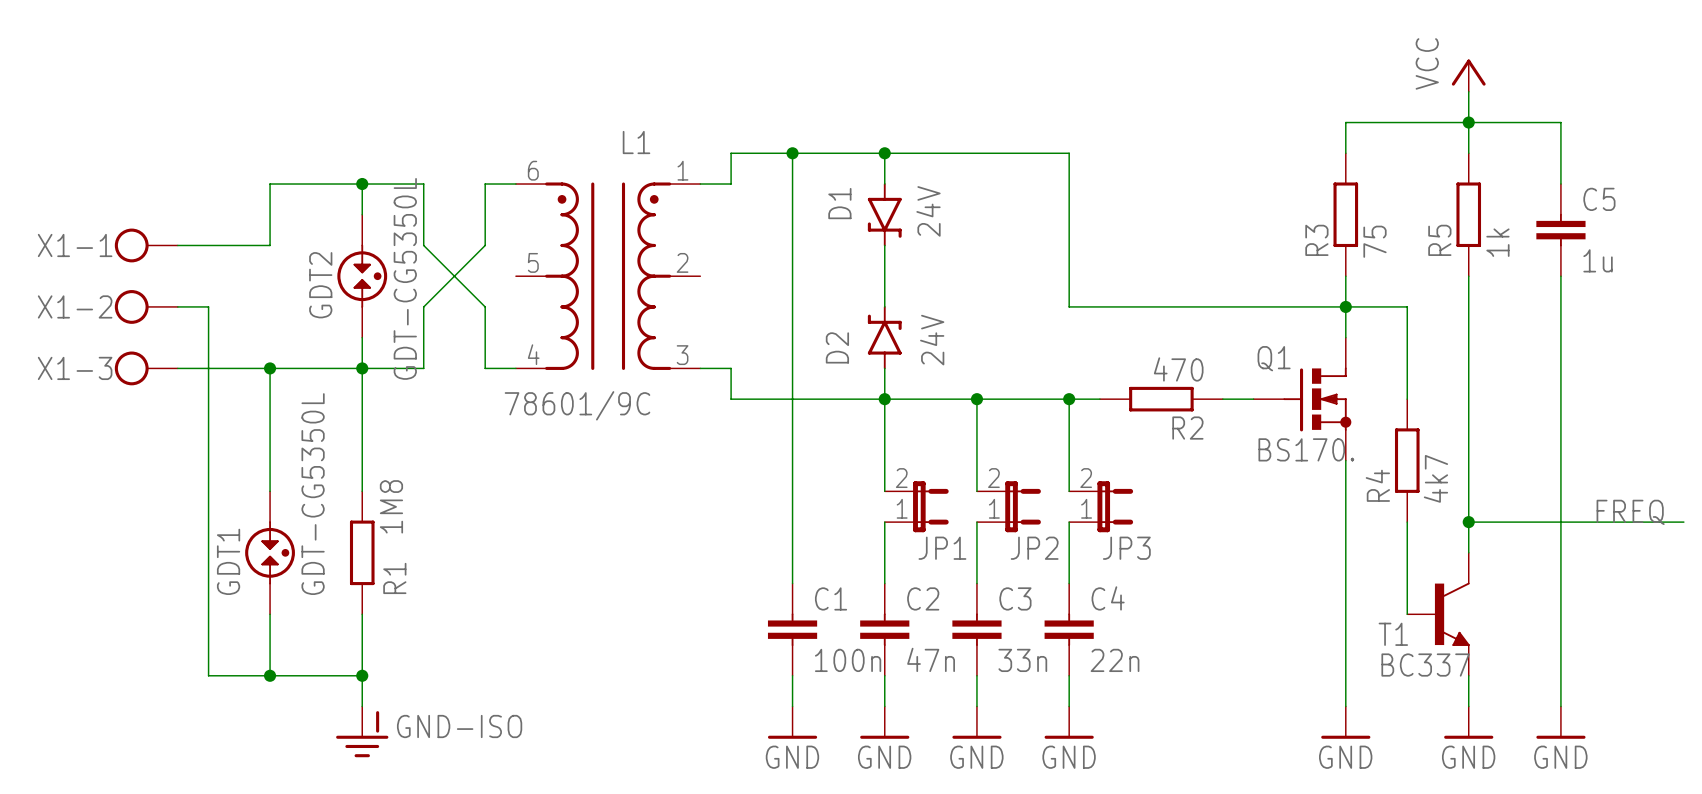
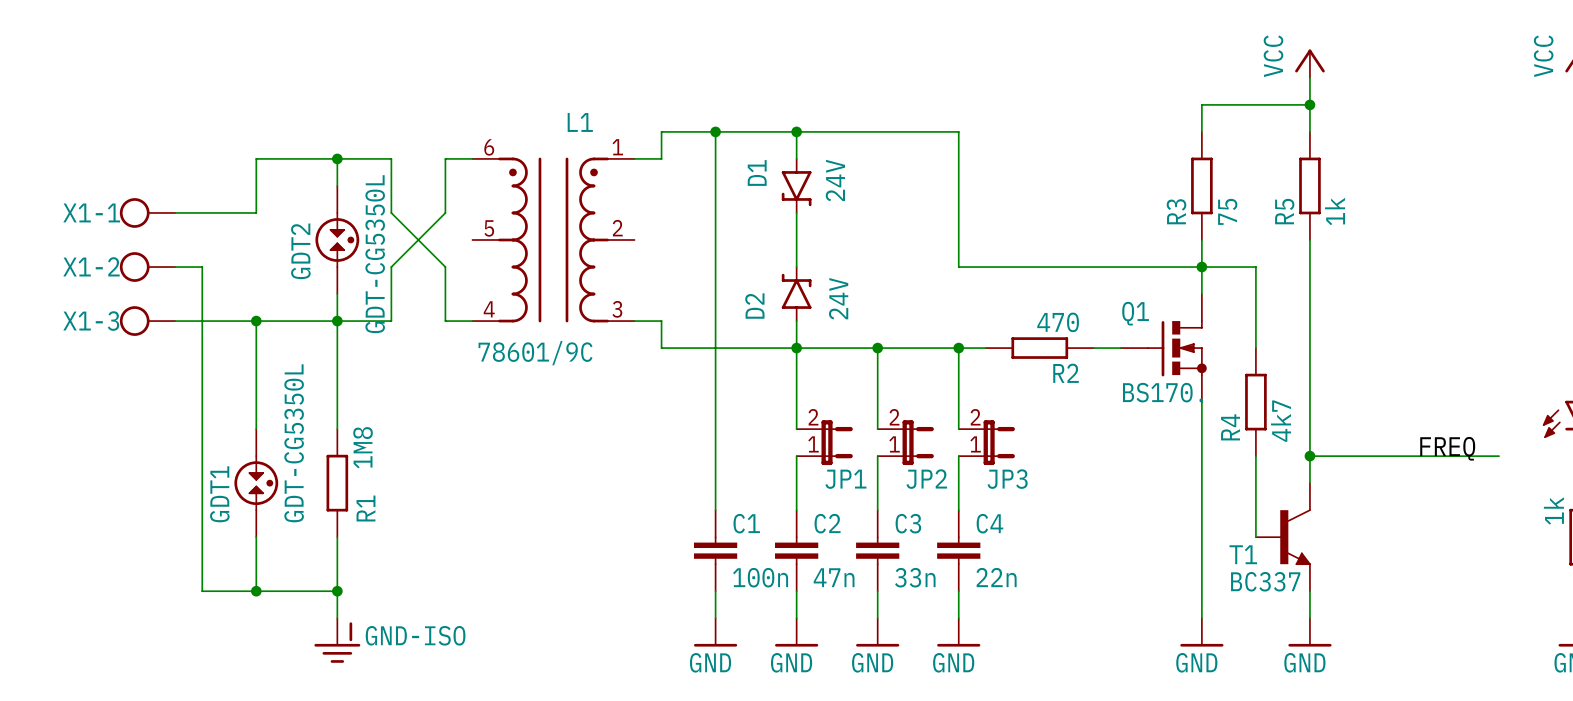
wire: (1468, 122) (1560, 122) (1560, 184) -> none
C5: 1u (1560, 230) -> none
wire: (1560, 276) (1560, 706) -> none
power symbol: GND (1560, 722) -> none

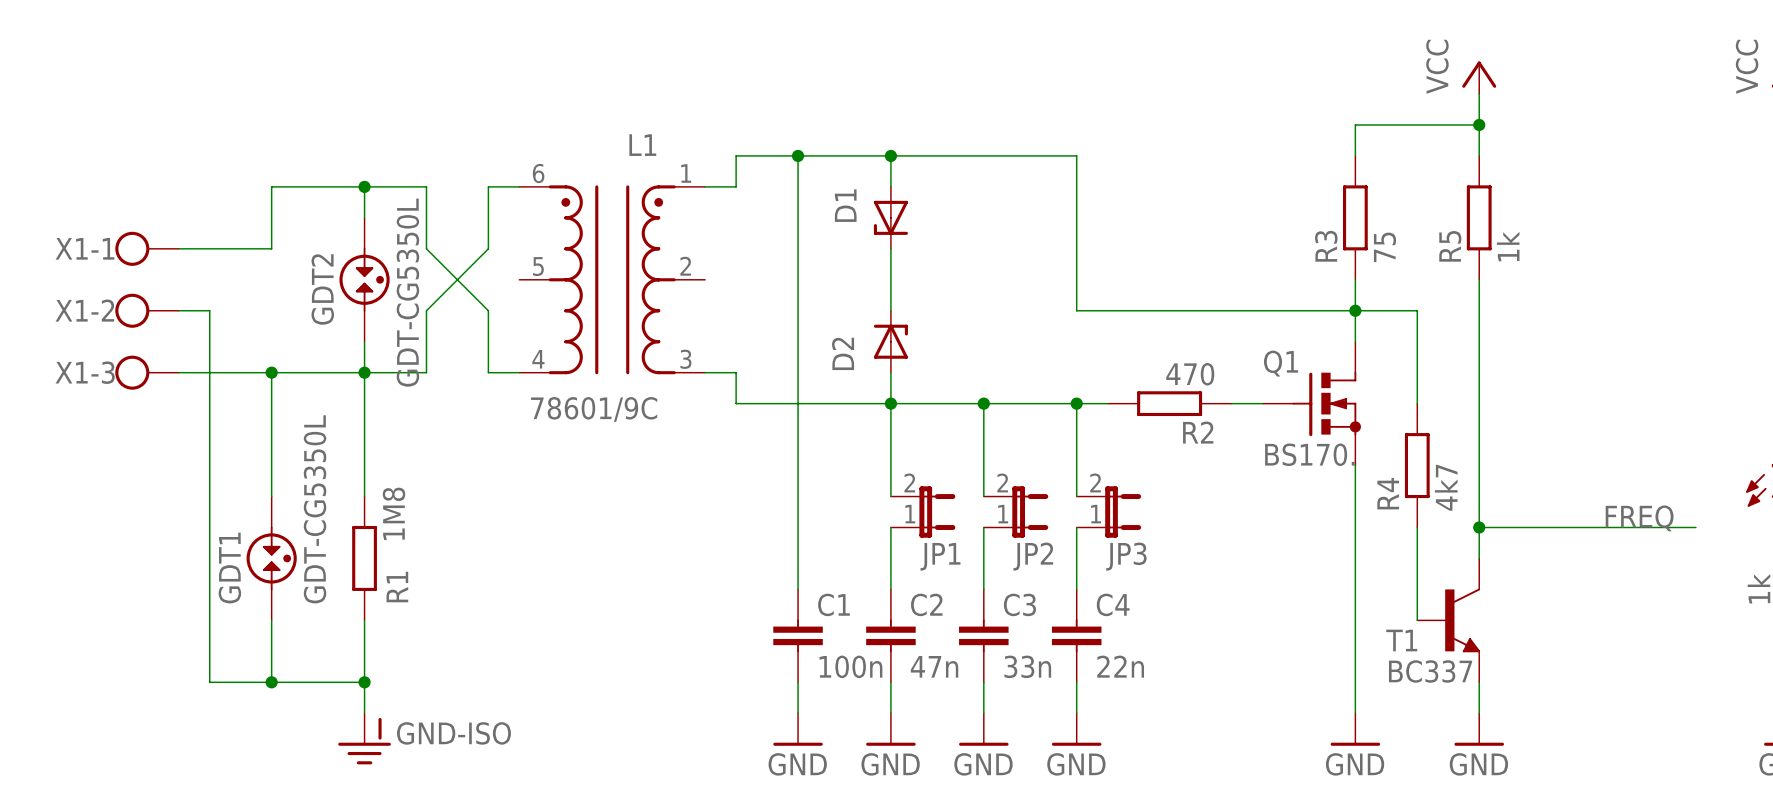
D1 symbol: [781, 158, 812, 214] -> [873, 186, 908, 249]
D1 value: 24V (835, 180) -> none
D2 symbol: [781, 266, 812, 322] -> [873, 310, 908, 373]
D2 value: 24V (838, 298) -> none

